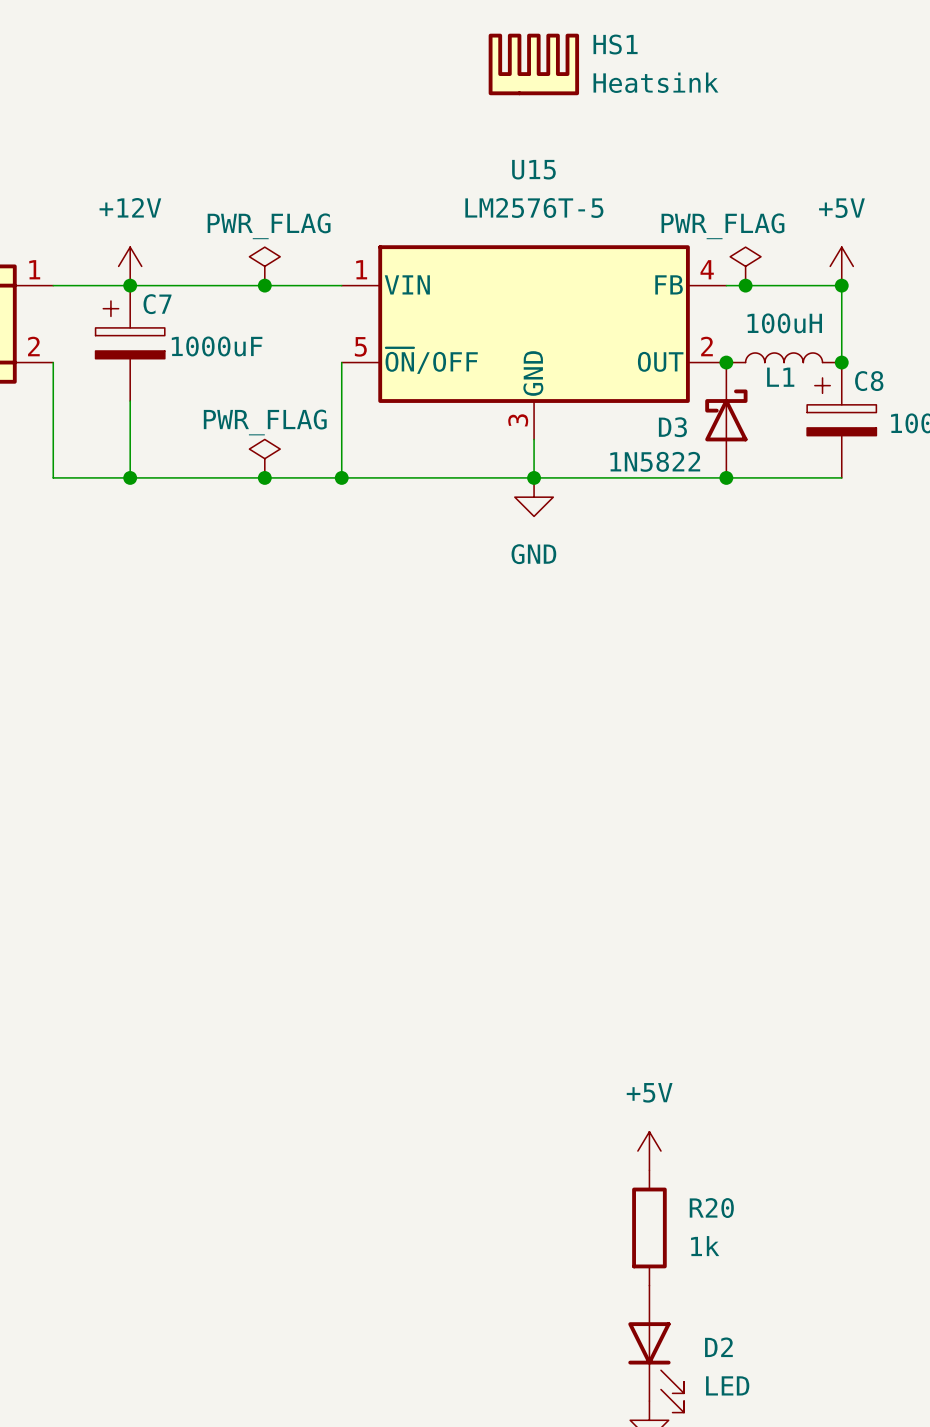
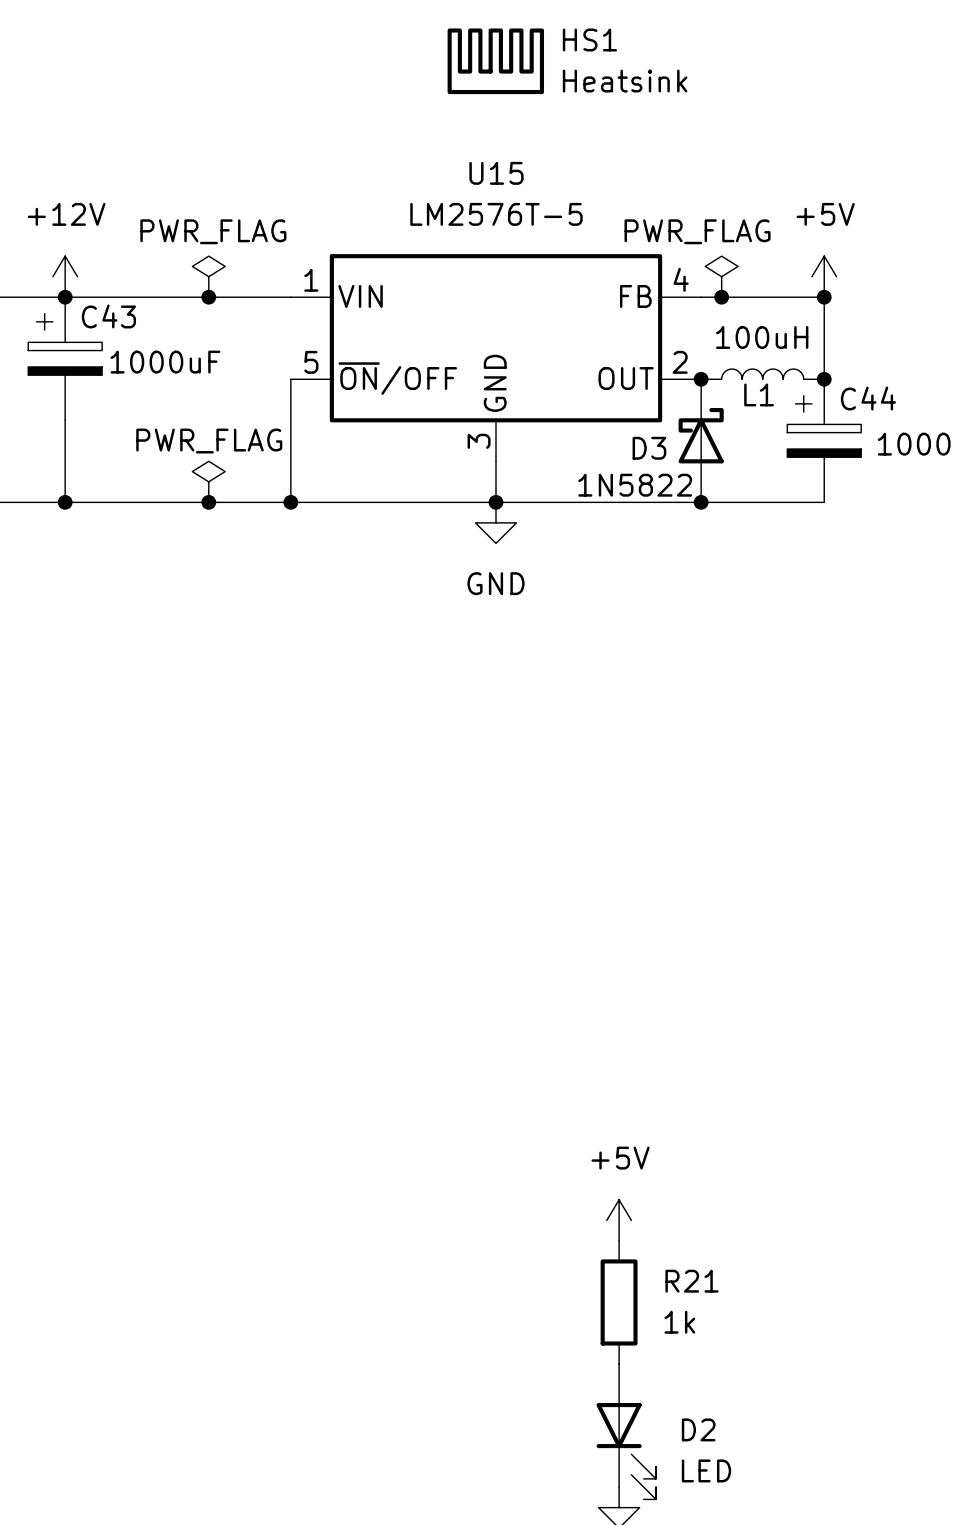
C7 name: C7 (157, 304) -> C43 (108, 316)
C8 name: C8 (869, 381) -> C44 (868, 398)
R20 name: R20 (711, 1208) -> R21 (692, 1281)

